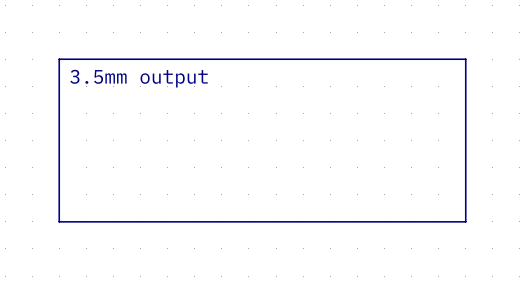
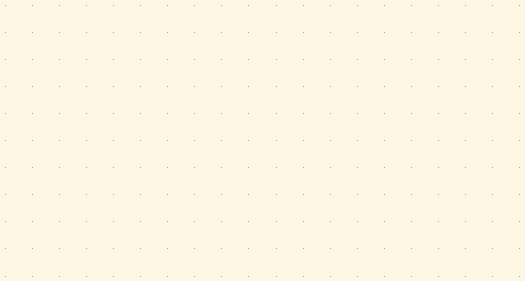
line: (59, 59) (465, 59) (465, 221) (59, 221) (59, 59) -> none
text: 3.5mm output (139, 78) -> none

